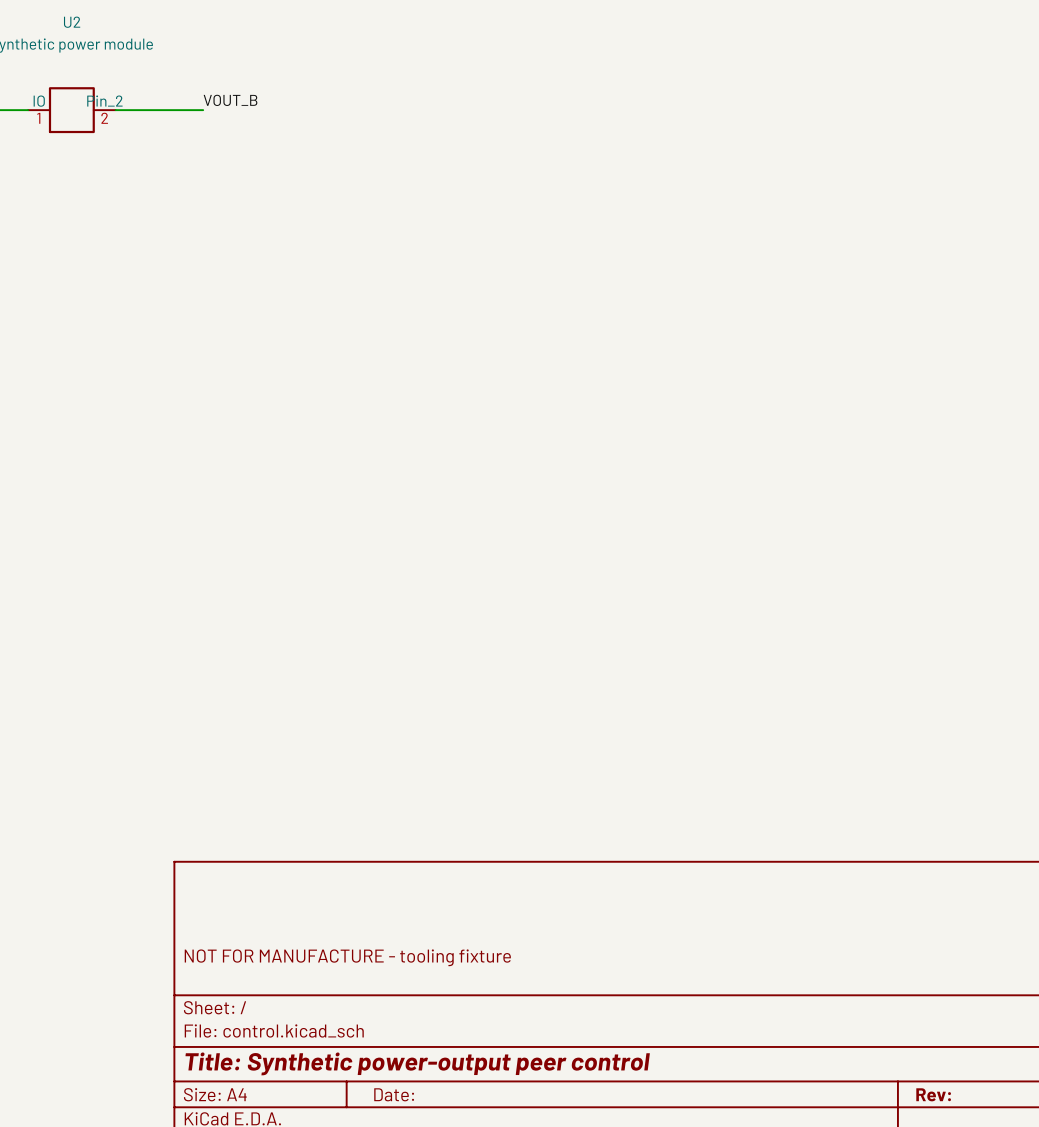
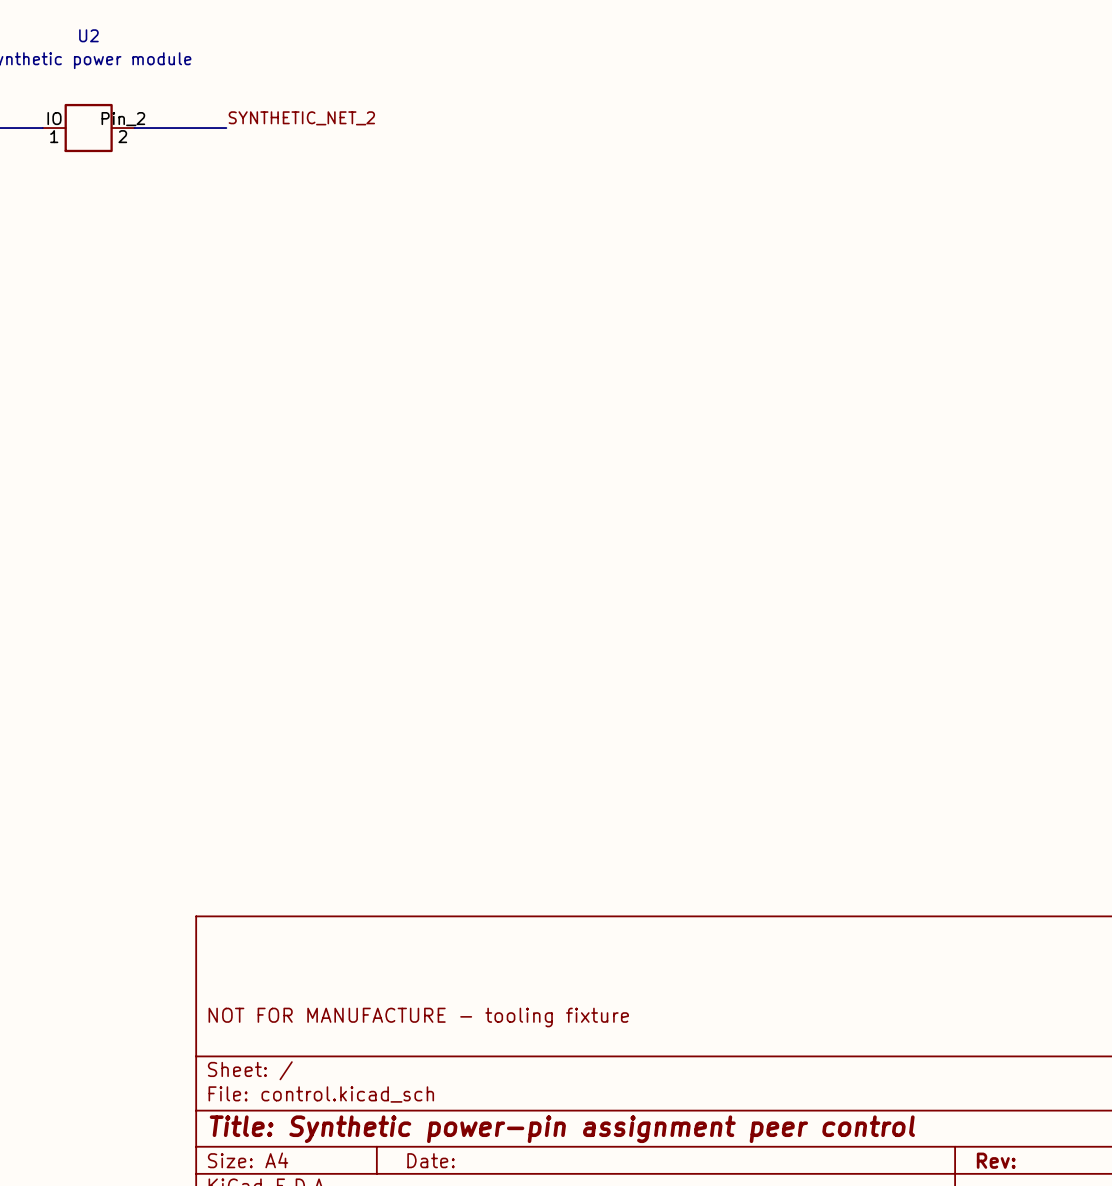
label: VOUT_B (230, 100) -> SYNTHETIC_NET_2 (301, 118)
title block: Title: Synthetic power-output peer control (417, 1063) -> Title: Synthetic power-pin assignment peer control (562, 1129)

